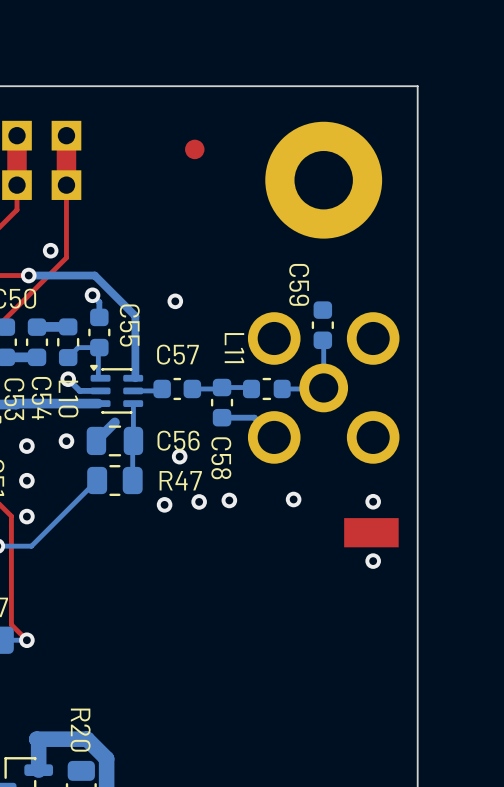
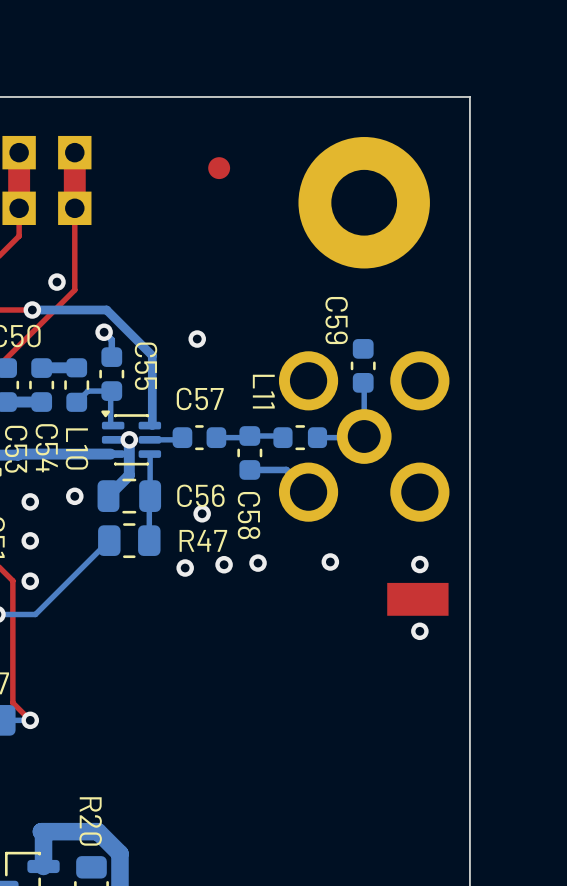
bottom track: (68, 379) (79, 390) (98, 390) -> (129, 475) (129, 439) (110, 439)
via position: (68, 379) -> (129, 439)

